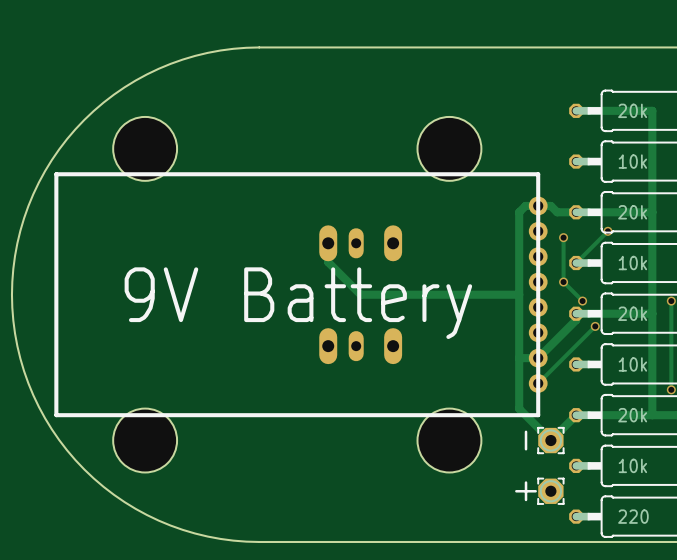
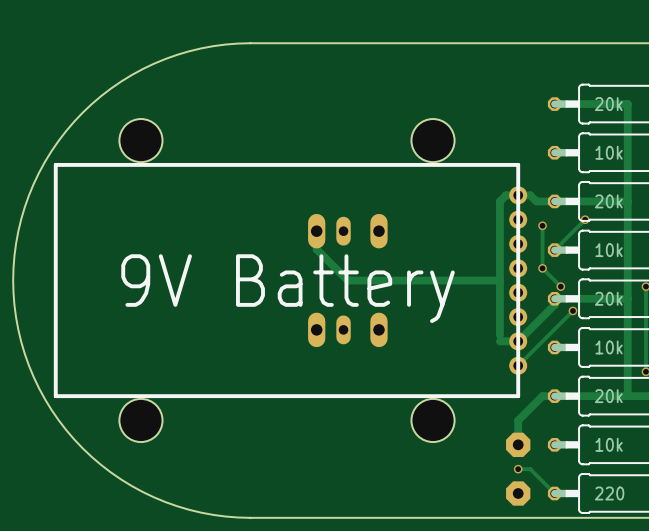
hole: (145, 148) -> none
part: none -> (140, 140)
hole: (449, 148) -> none
part: none -> (433, 140)
track: (519, 351) (519, 408) (550, 440) (576, 415) -> (518, 444) (518, 420) (542, 396) (554, 396)
hole: (145, 440) -> none
part: none -> (140, 420)
hole: (449, 440) -> none
part: none -> (433, 420)
part side: bottom (550, 440) -> top (518, 444)
track: none -> (518, 469) (530, 469) (554, 493)
via: none -> (518, 469)
part side: bottom (550, 491) -> top (518, 493)

